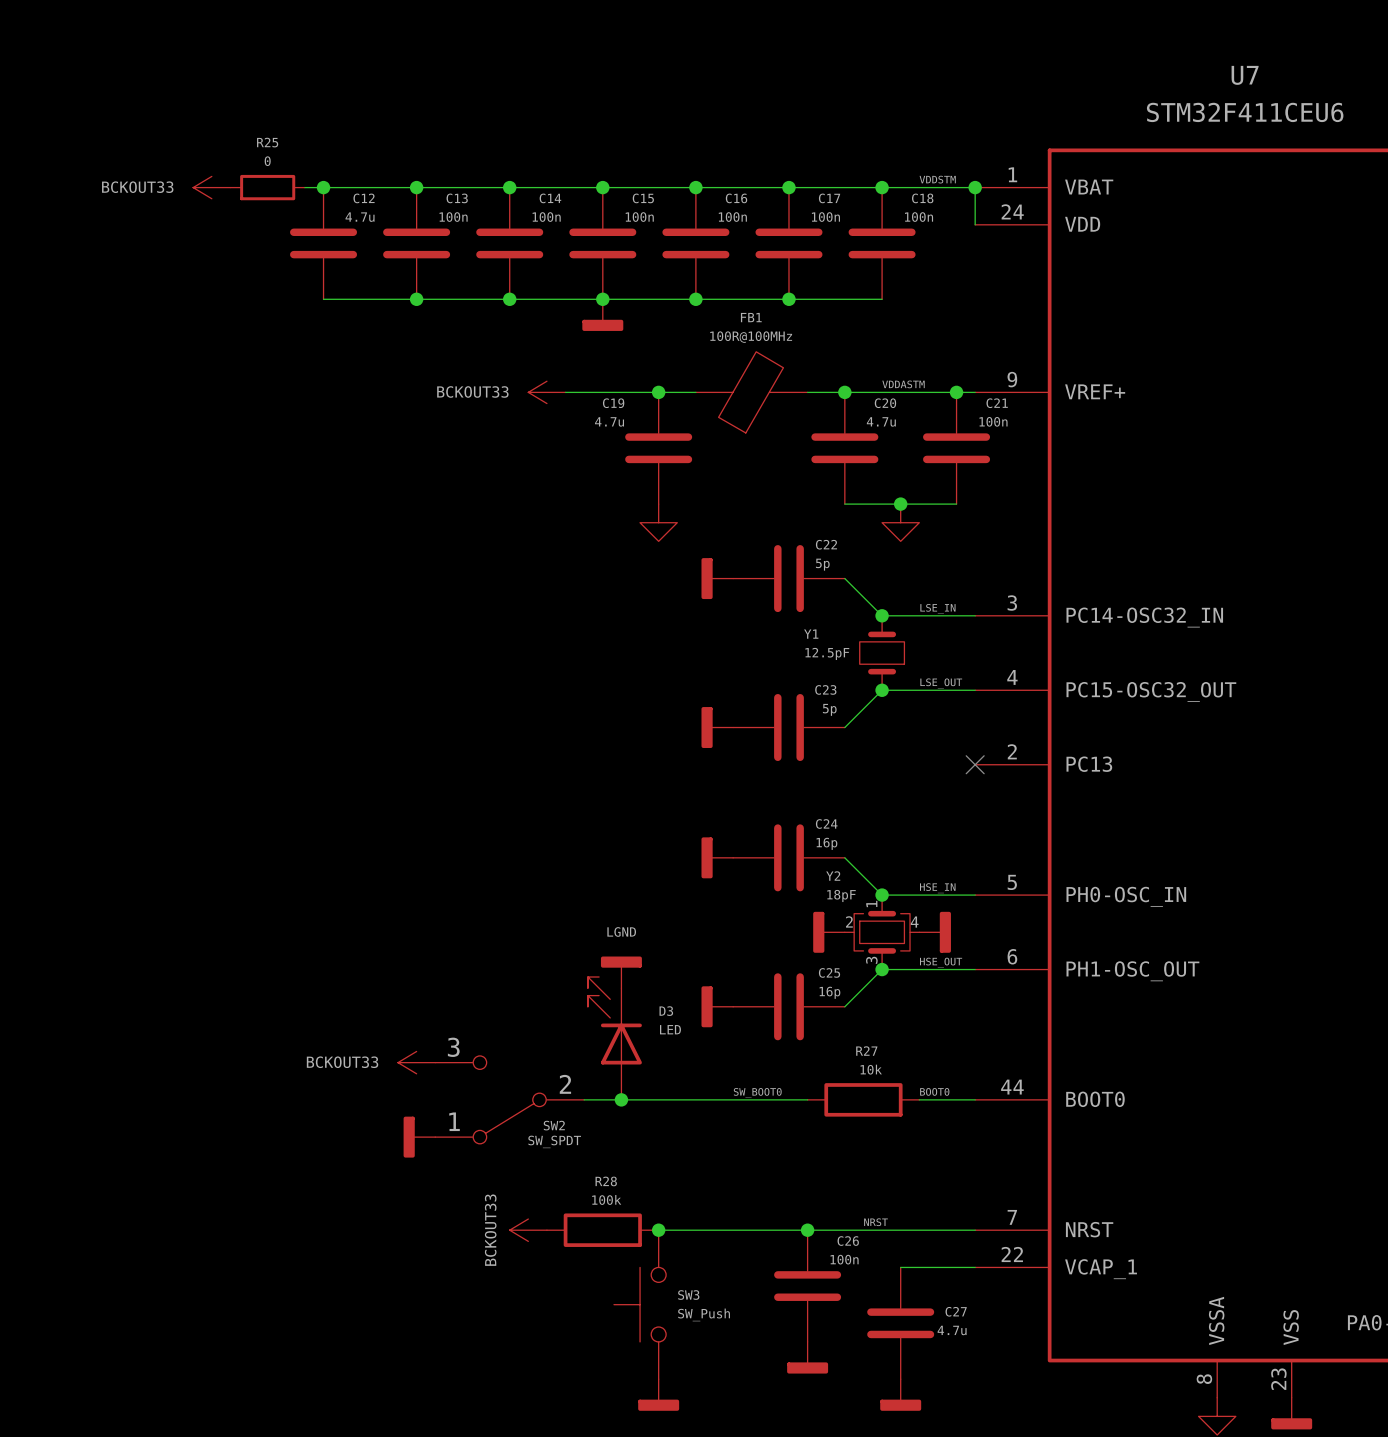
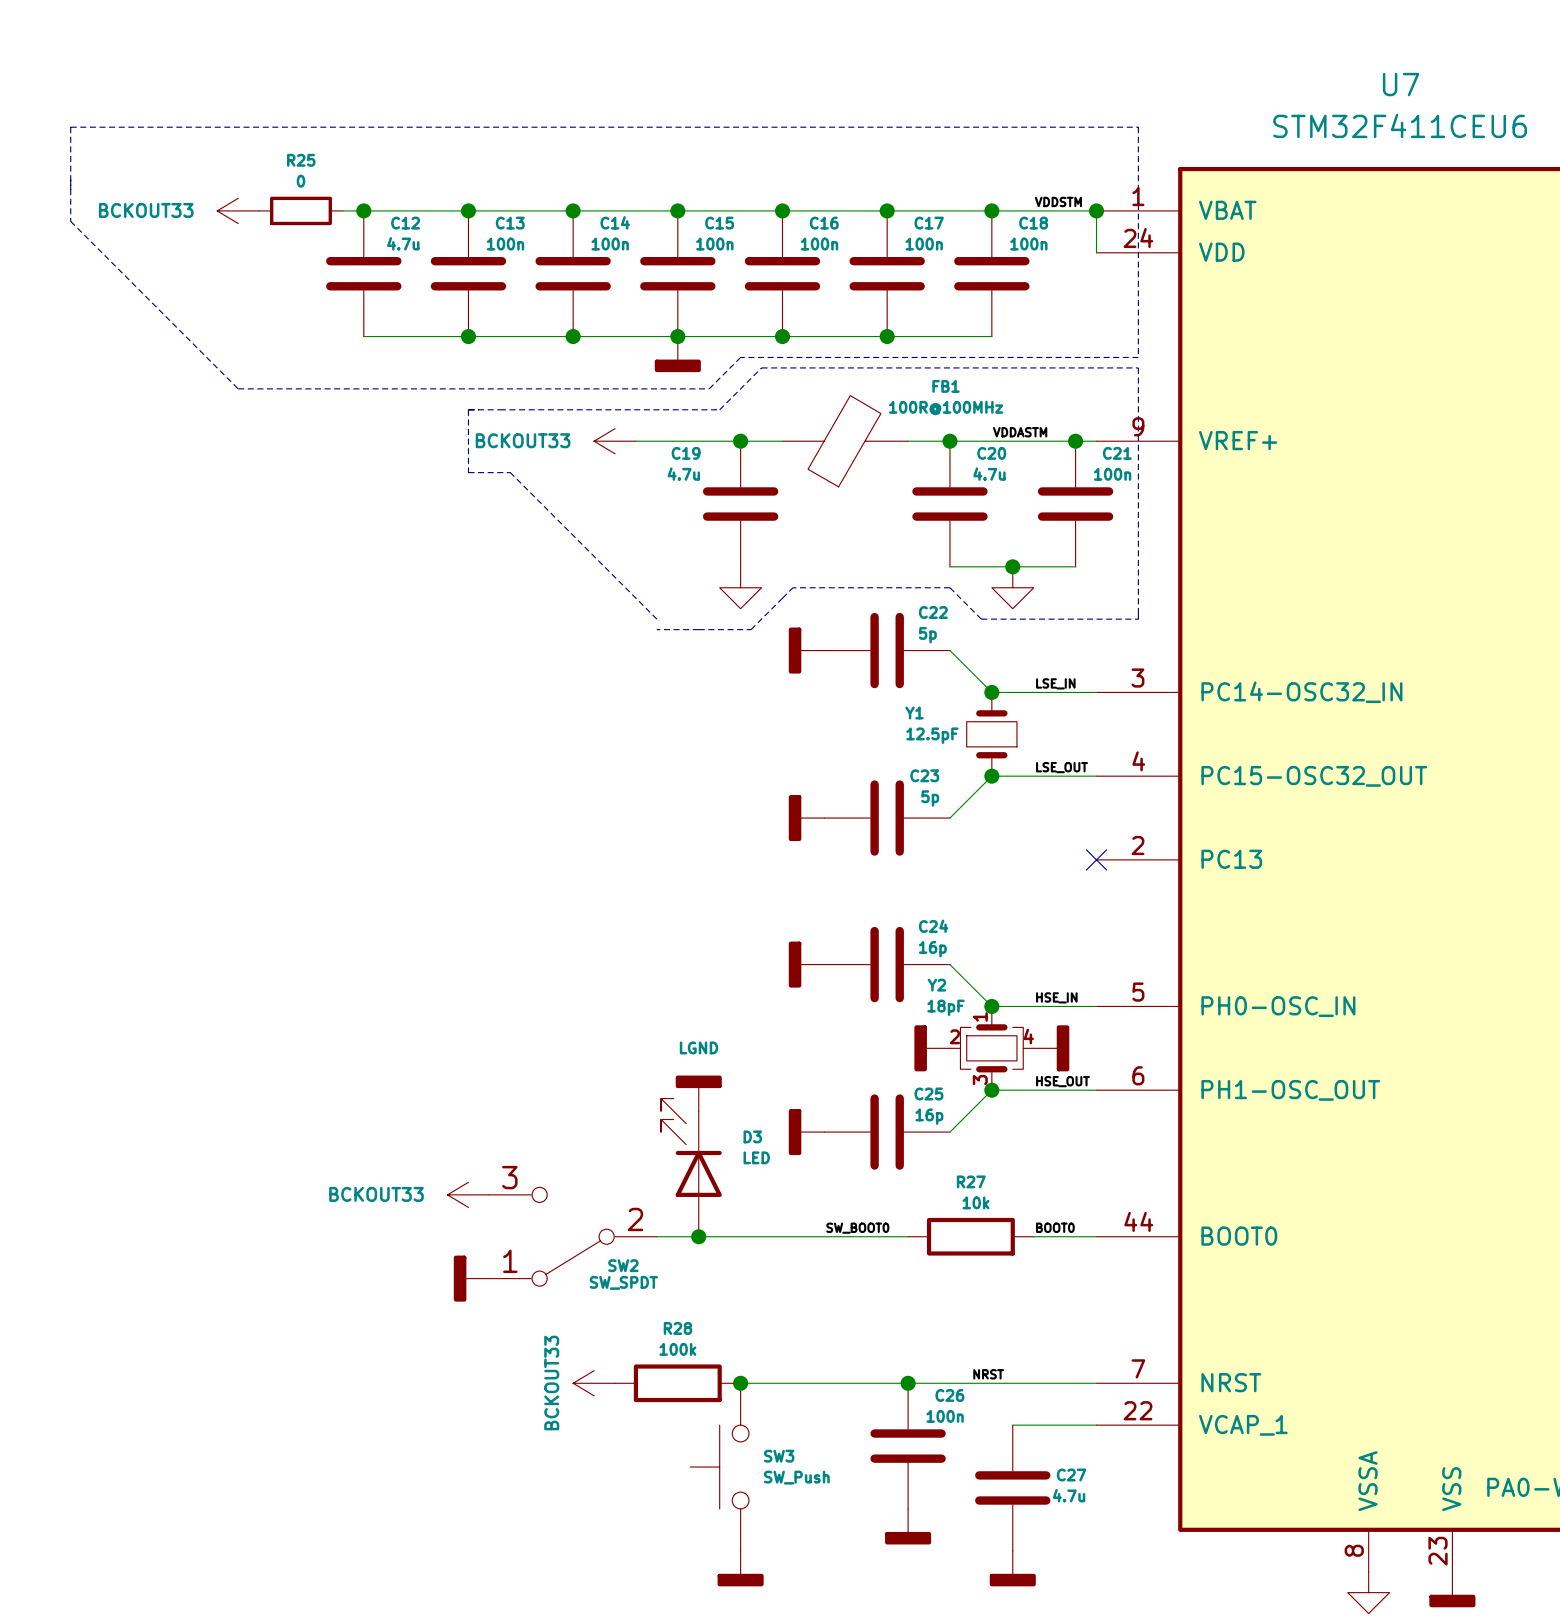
line: none -> (70, 127) (70, 221) (238, 388) (709, 388) (740, 357) (1138, 357) (1138, 127) (70, 127)
FB1 name position: FB1 (751, 317) -> FB1 (946, 386)
FB1 value position: 100R@100MHz (751, 337) -> 100R@100MHz (946, 408)
line: none -> (656, 619) (510, 472) (468, 472) (468, 409) (719, 409) (761, 367) (1138, 367) (1138, 619) (981, 619) (949, 587) (792, 587) (751, 629) (656, 629)

